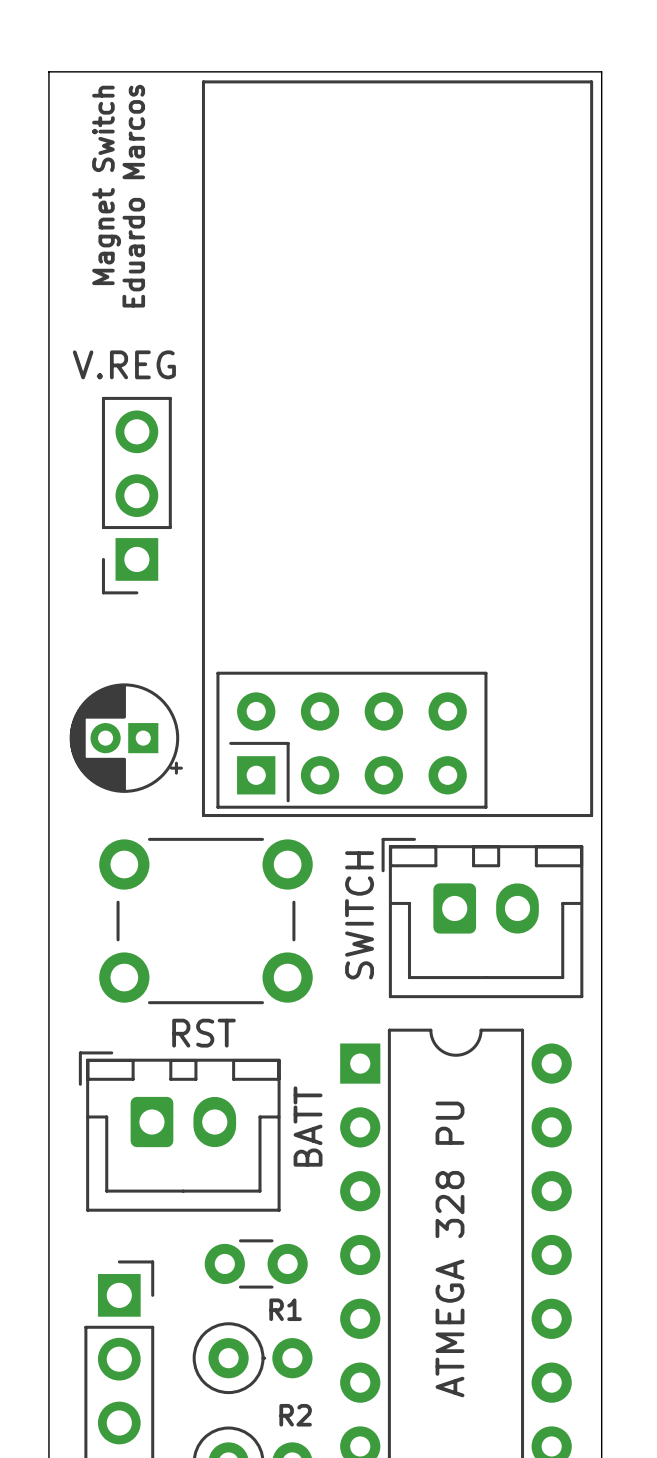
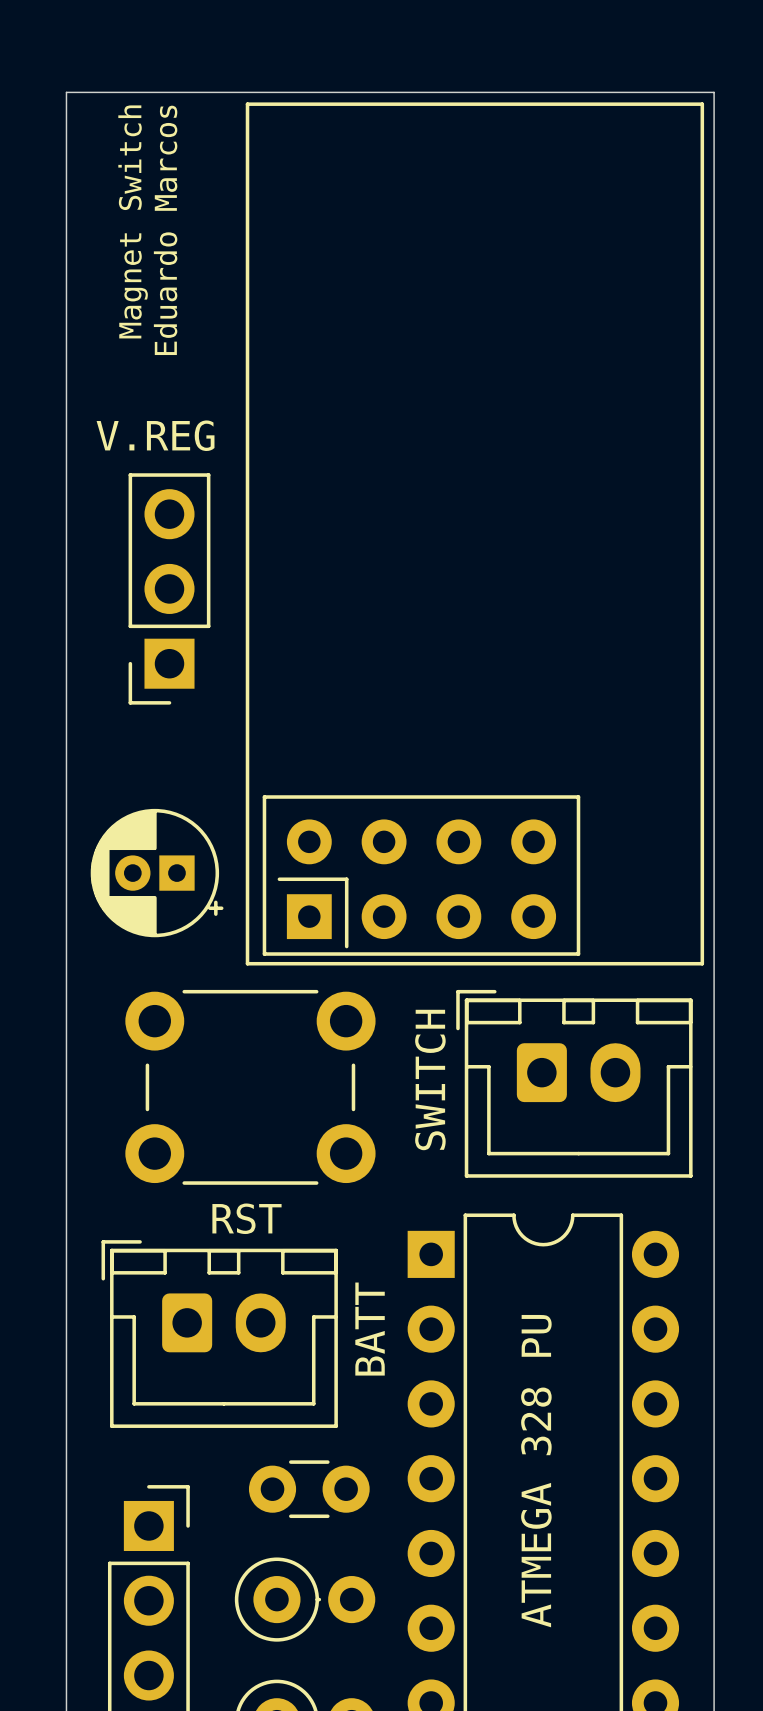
R1 name: R1 (285, 1309) -> none
R2 name: R2 (295, 1415) -> none

